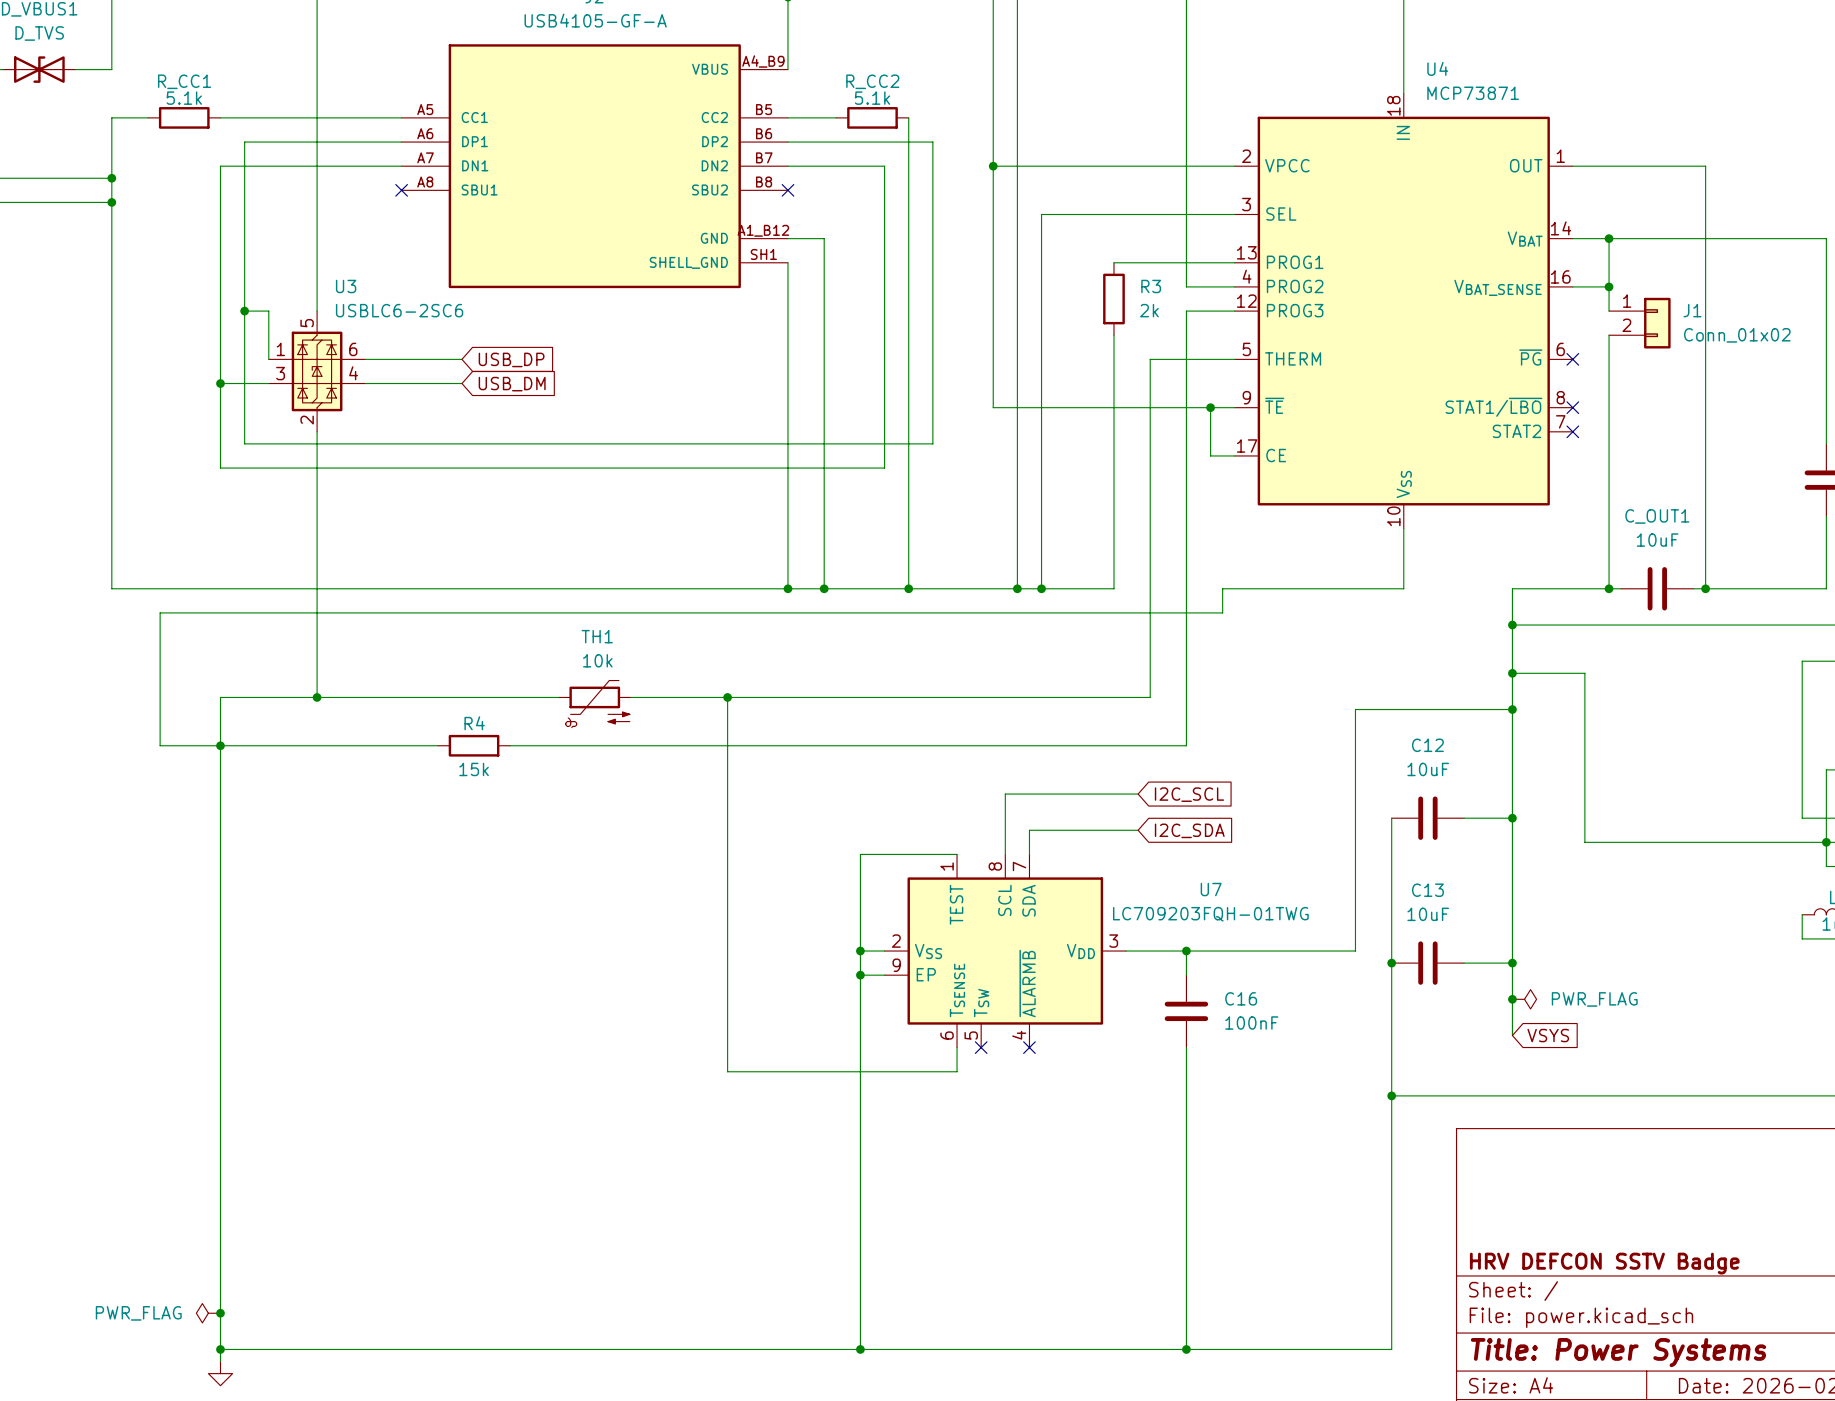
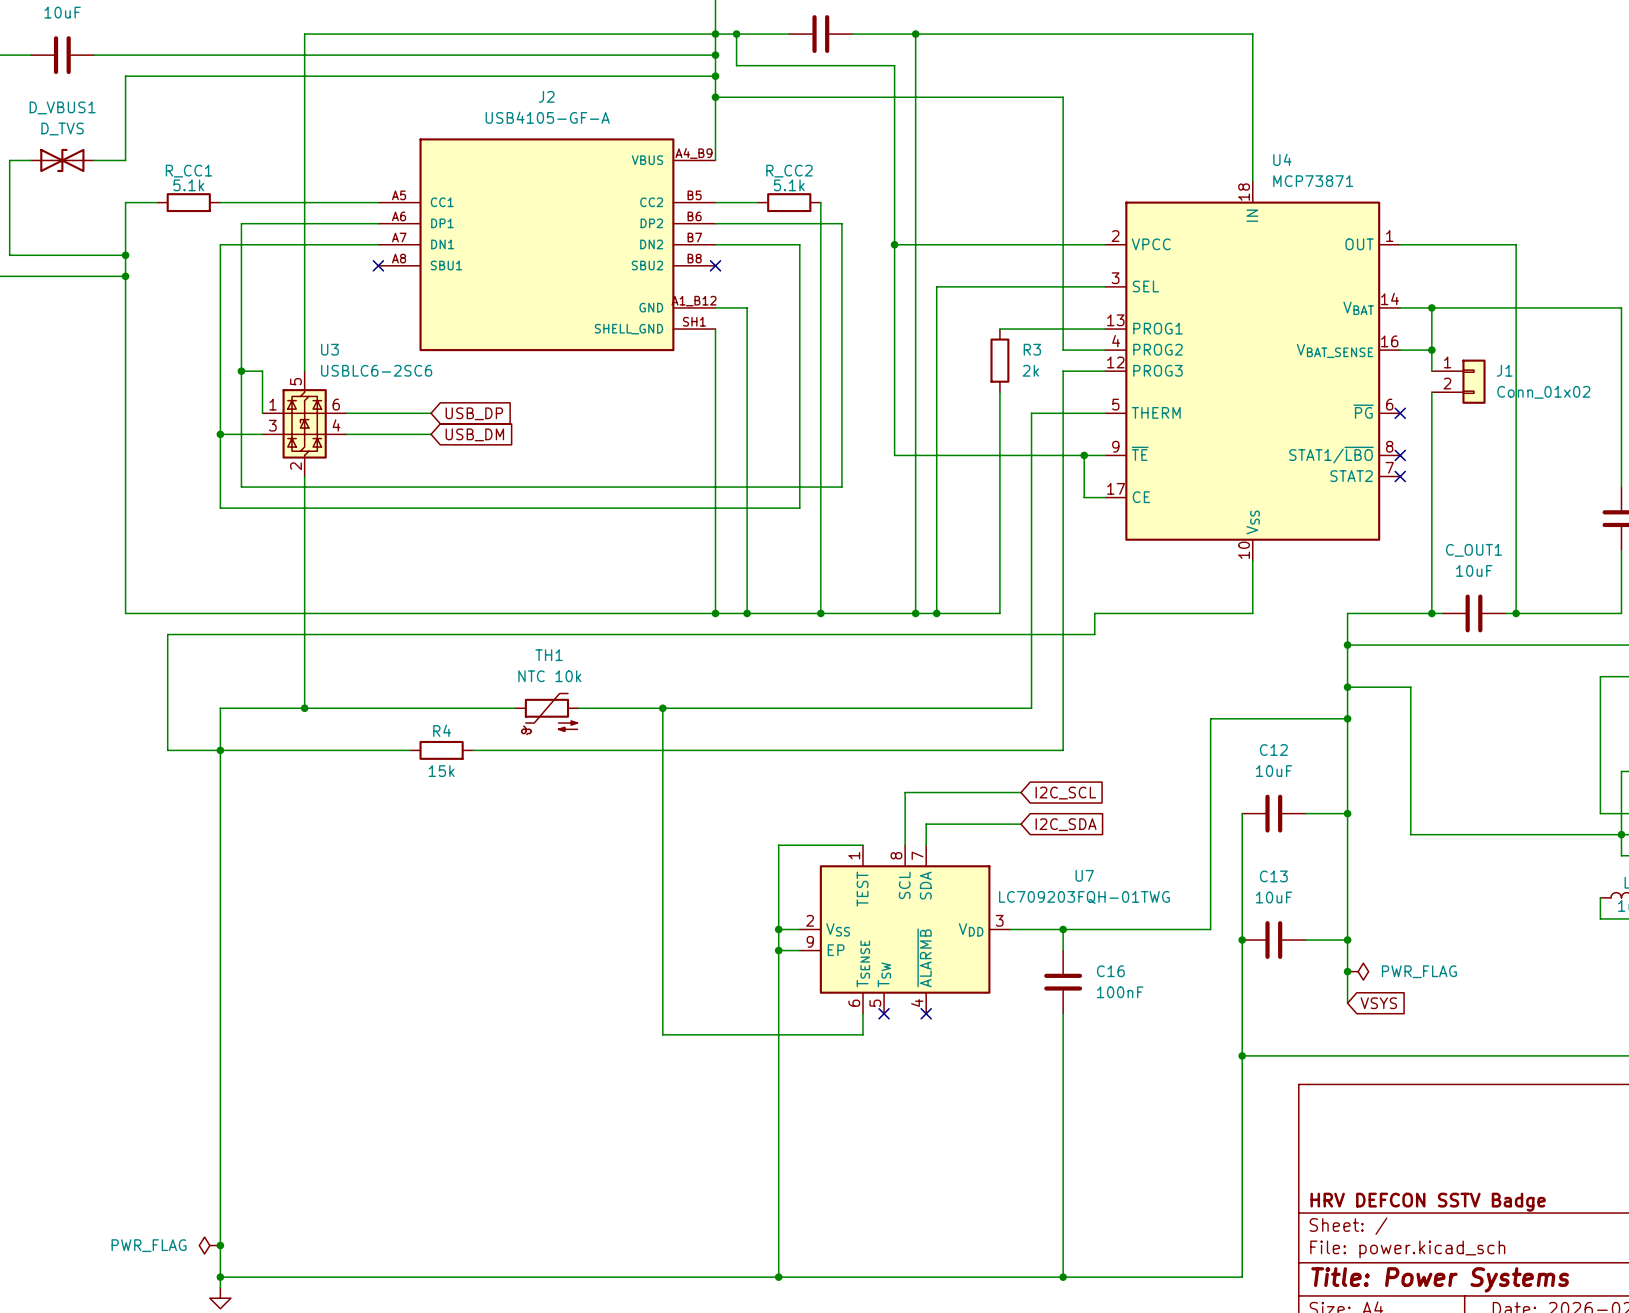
TH1 value: 10k (597, 660) -> NTC 10k (549, 676)

